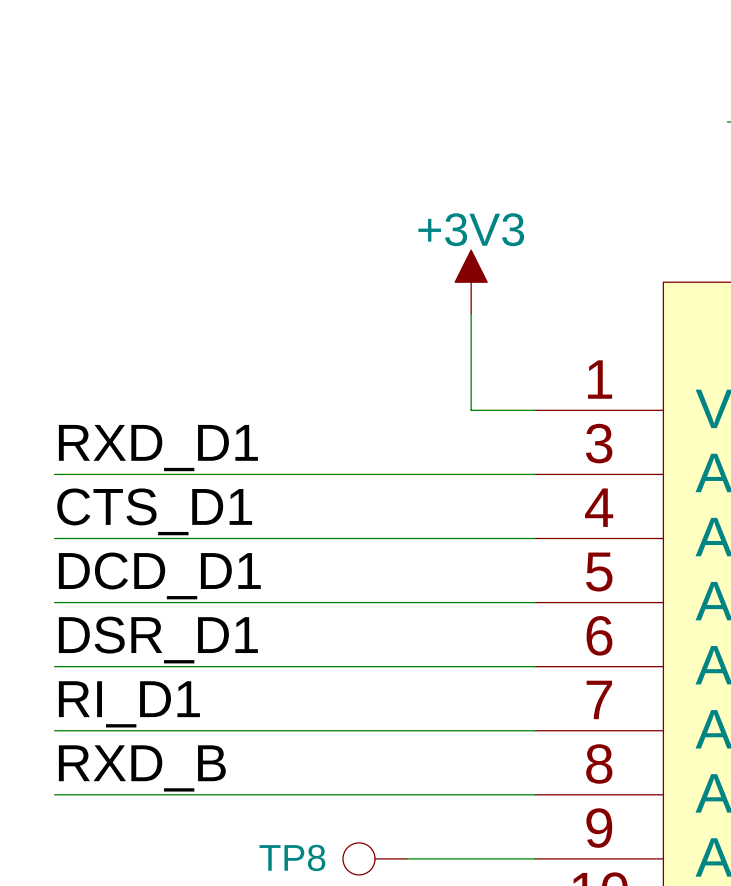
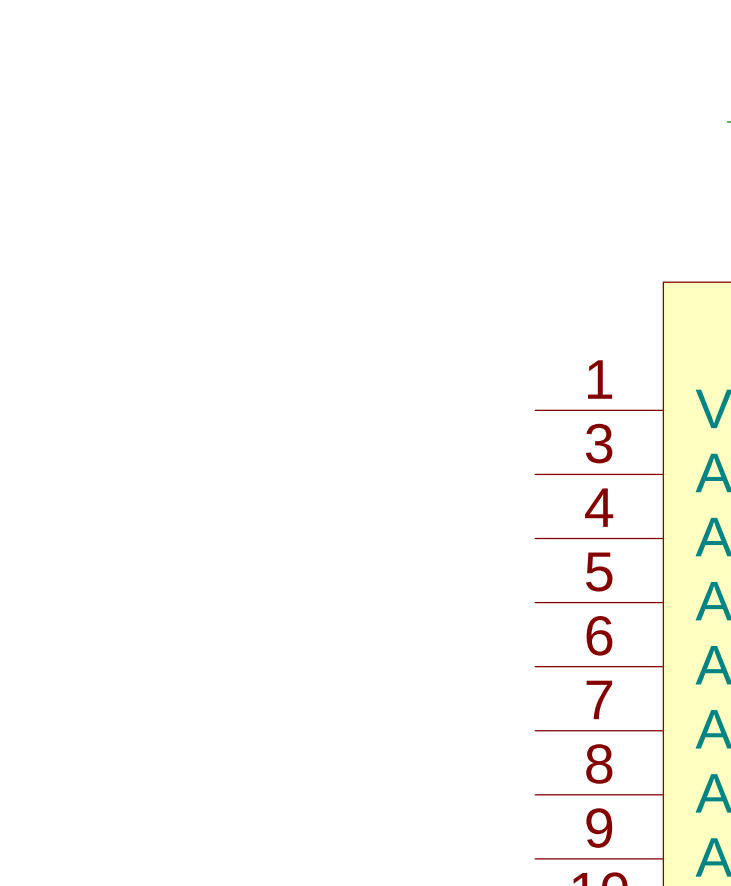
power symbol: +3V3 (471, 282) -> none
wire: (471, 314) (471, 410) (535, 410) -> none
label: RXD_D1 (158, 448) -> none
wire: (54, 474) (535, 474) -> none
label: CTS_D1 (154, 511) -> none
wire: (54, 538) (535, 538) -> none
label: DCD_D1 (159, 575) -> none
wire: (54, 602) (535, 602) -> none
label: DSR_D1 (158, 640) -> none
wire: (54, 666) (535, 666) -> none
label: RI_D1 (129, 704) -> none
wire: (54, 730) (535, 730) -> none
label: RXD_B (142, 768) -> none
wire: (54, 794) (535, 794) -> none
TP8: (375, 858) -> none
wire: (407, 858) (535, 858) -> none

